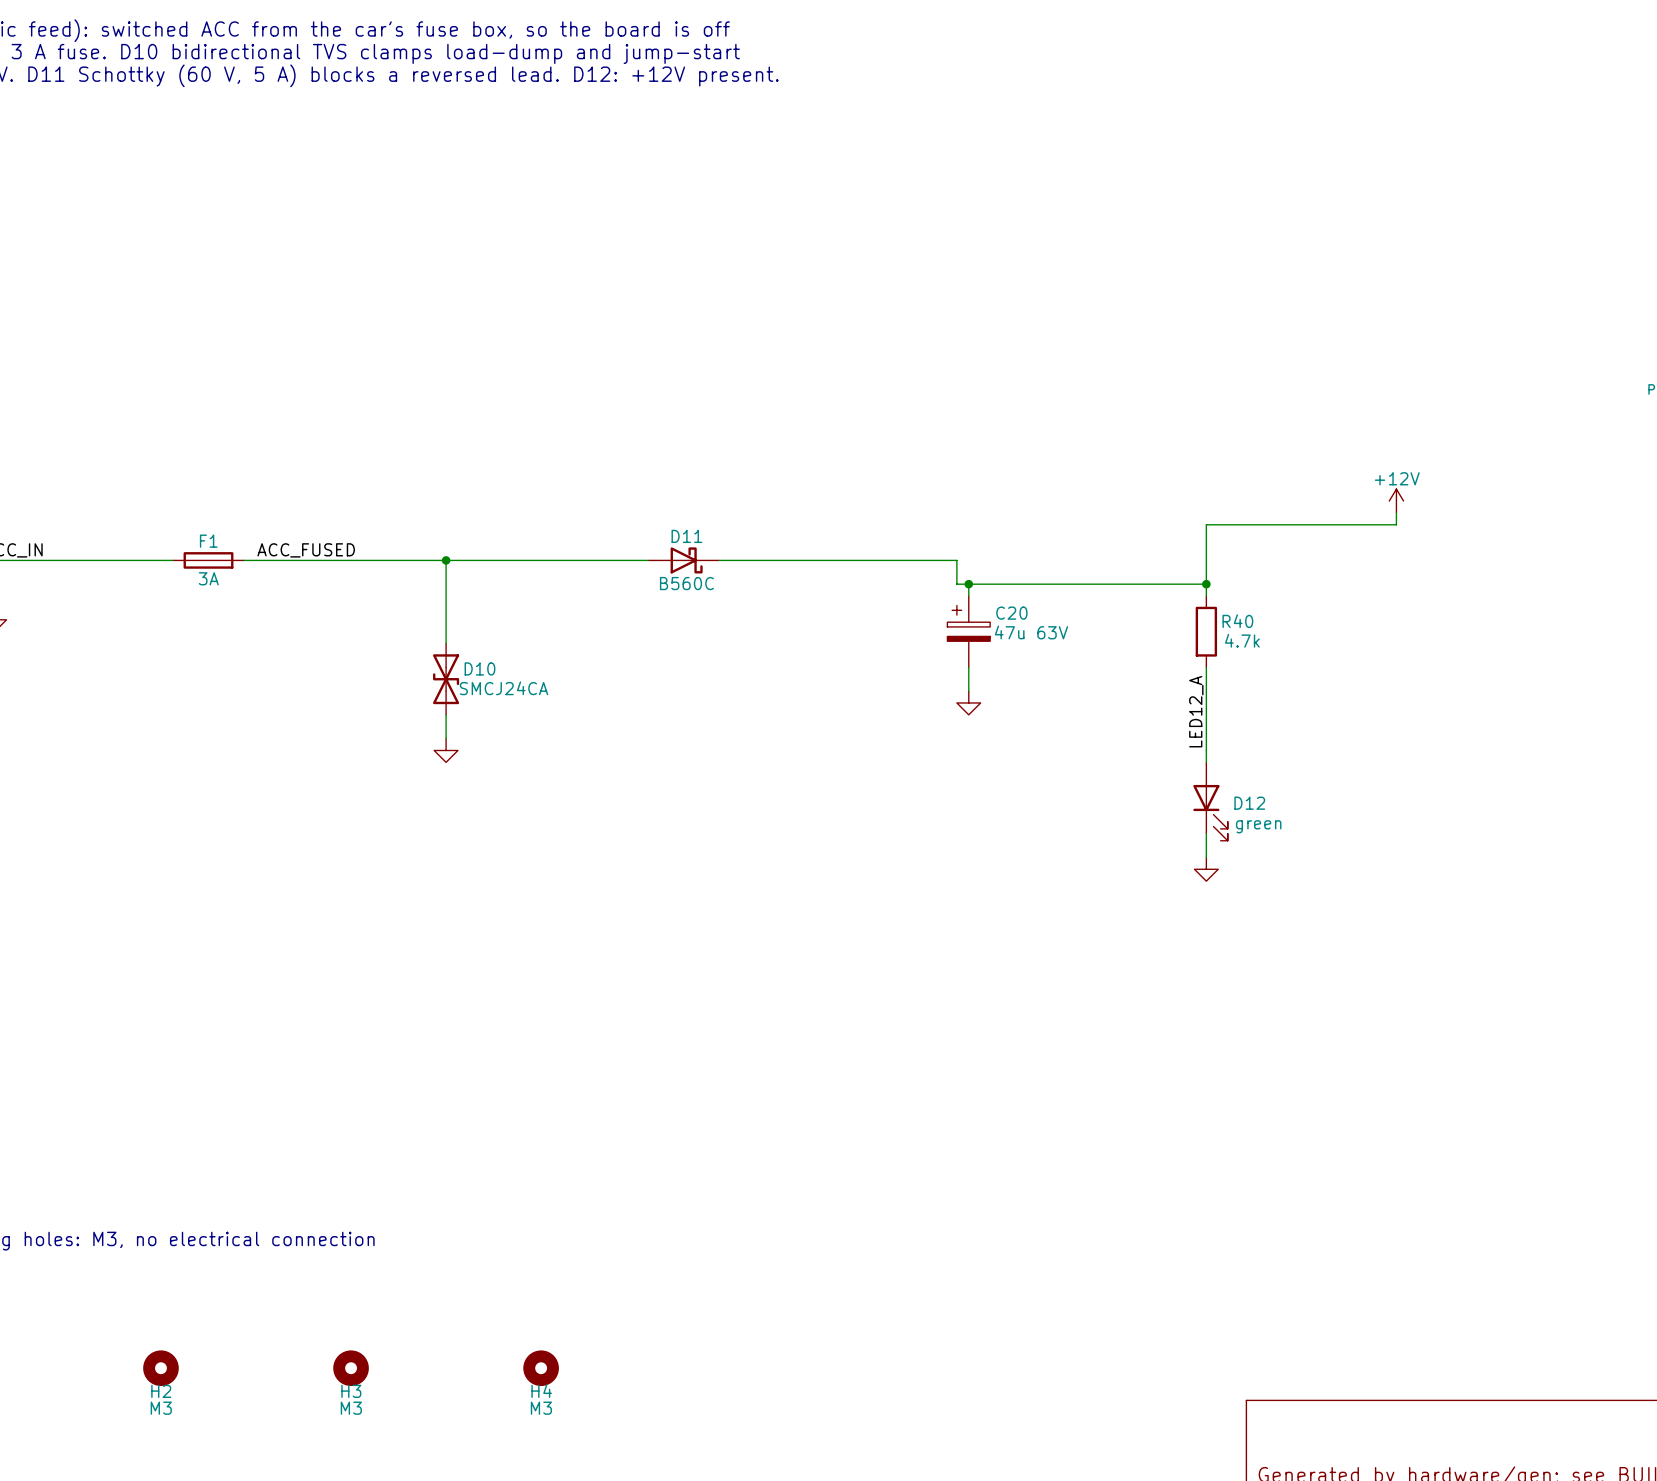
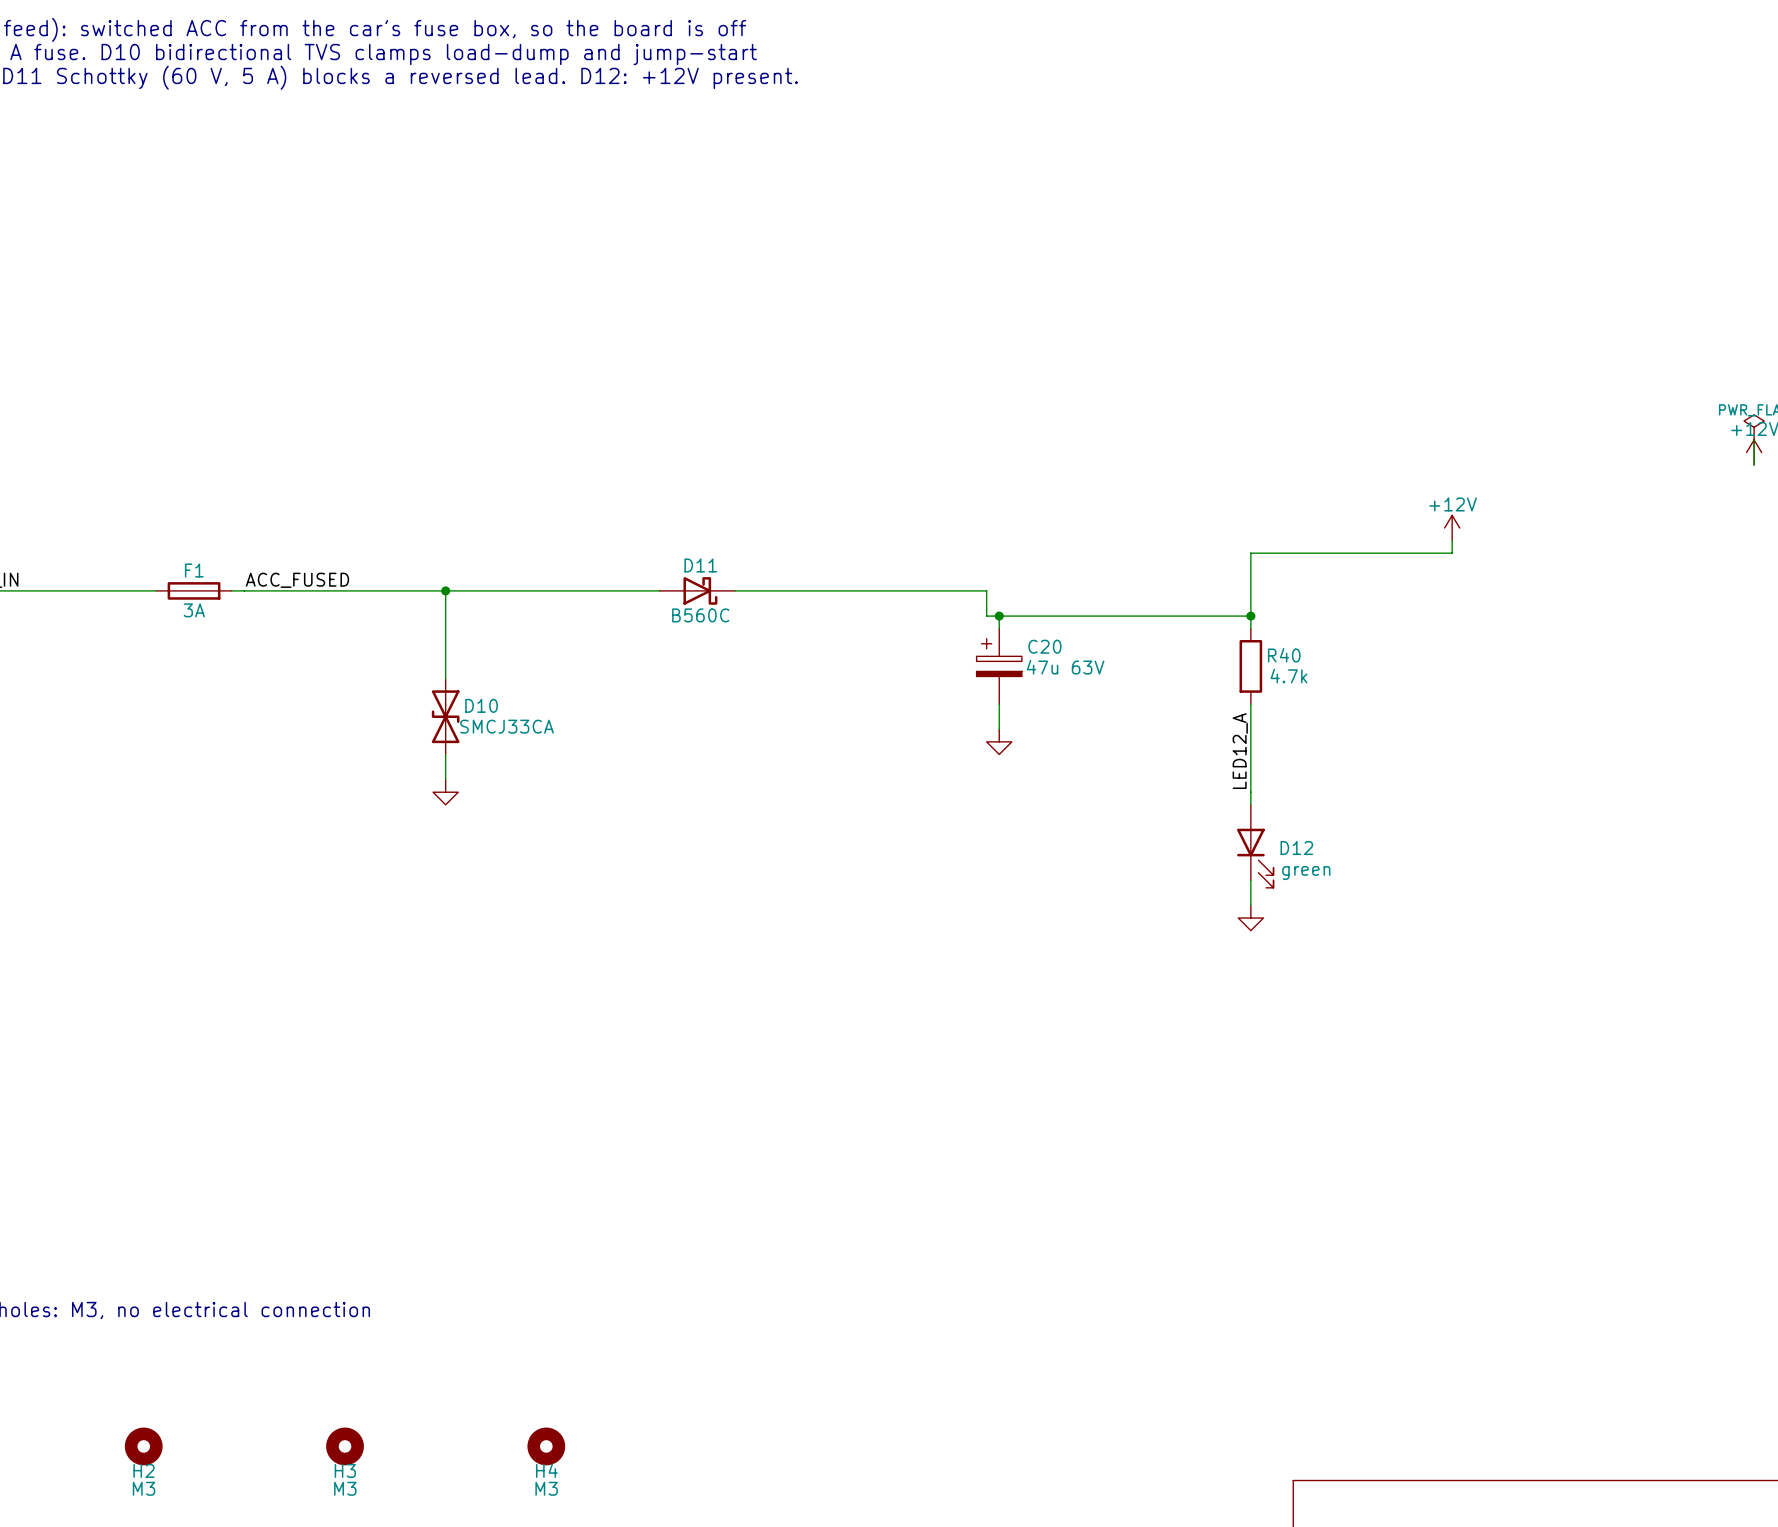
D10 value: SMCJ24CA (504, 688) -> SMCJ33CA (507, 726)

